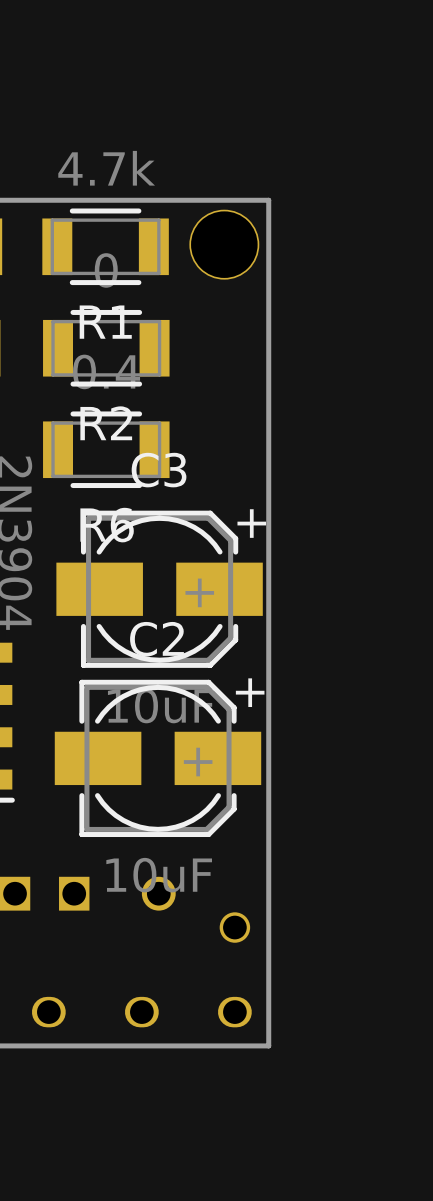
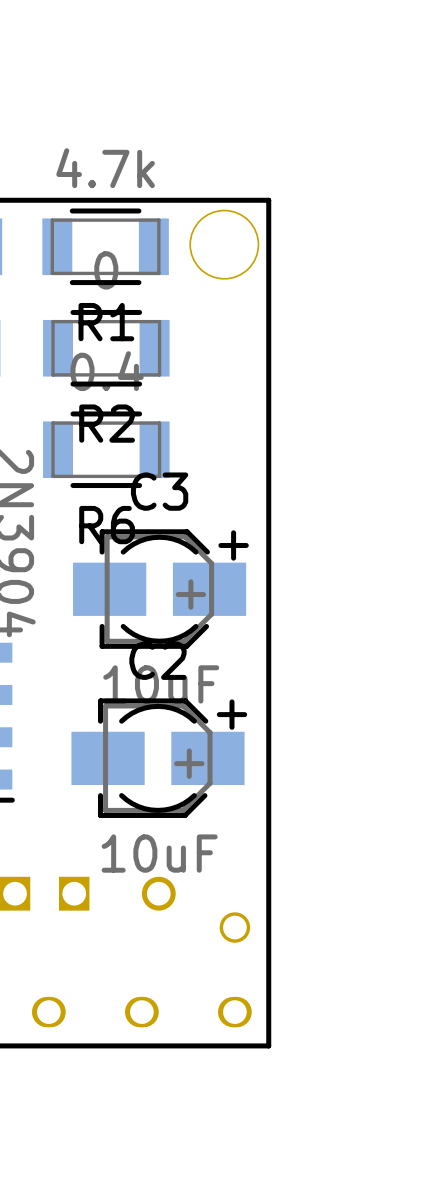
C3 footprint: [56, 510, 263, 668] -> [73, 529, 247, 649]
C2 footprint: [54, 679, 262, 838] -> [71, 698, 245, 818]

